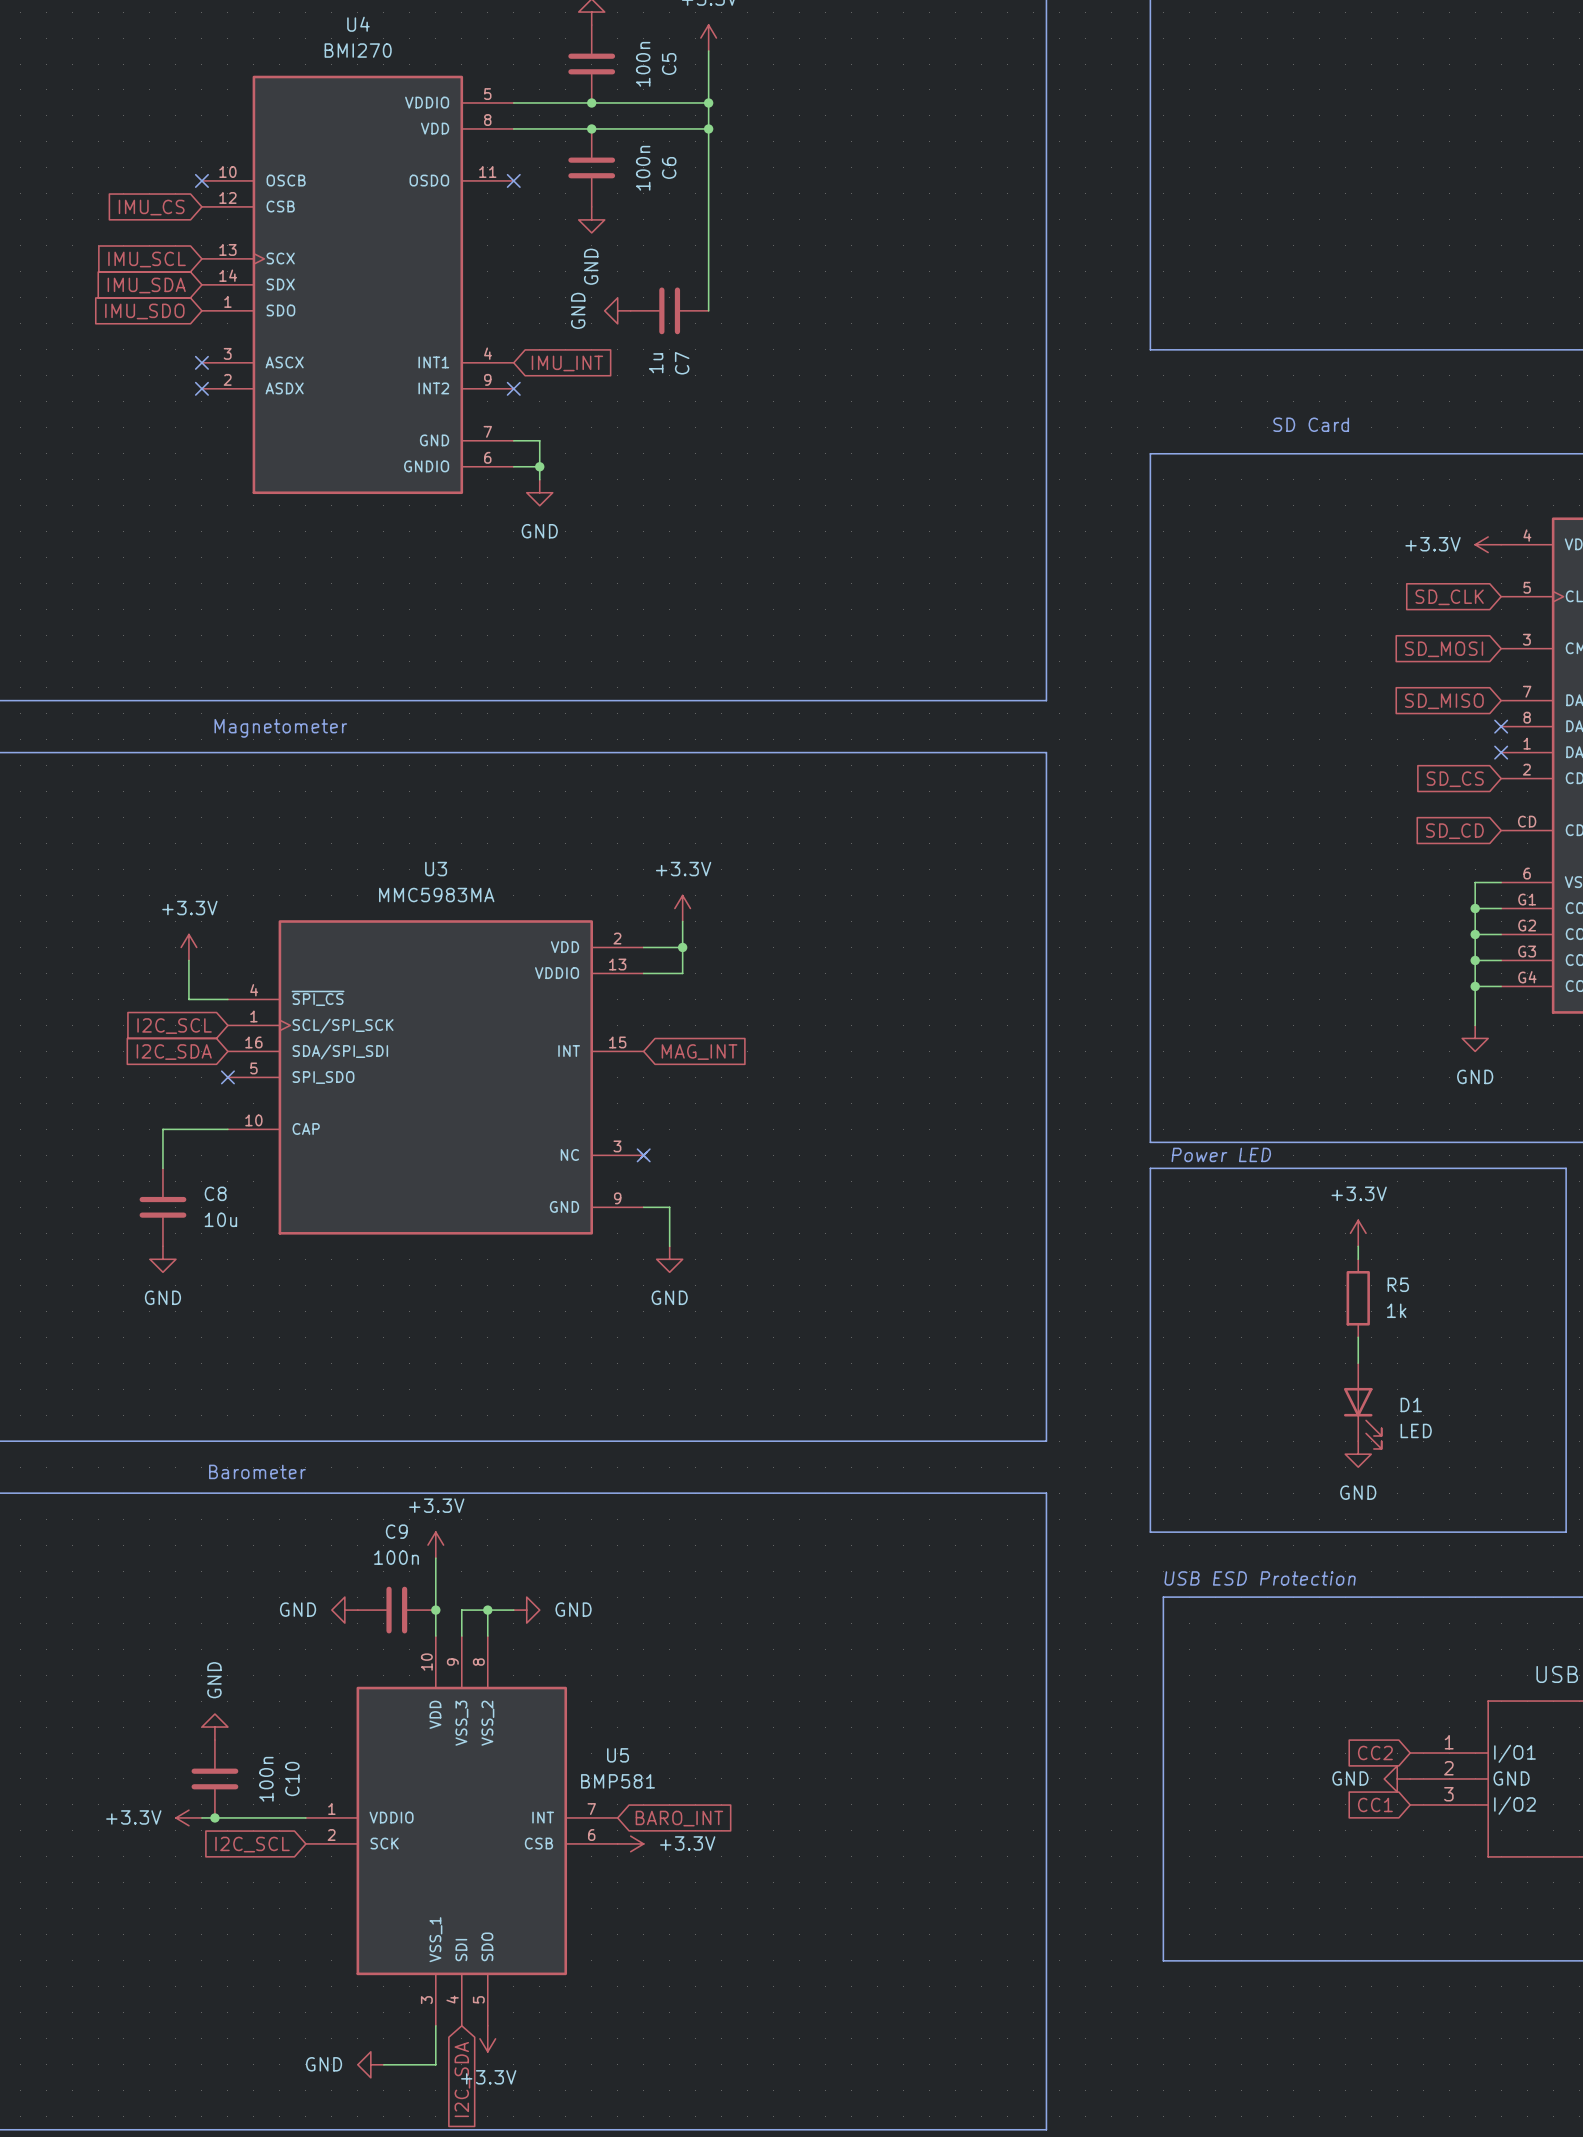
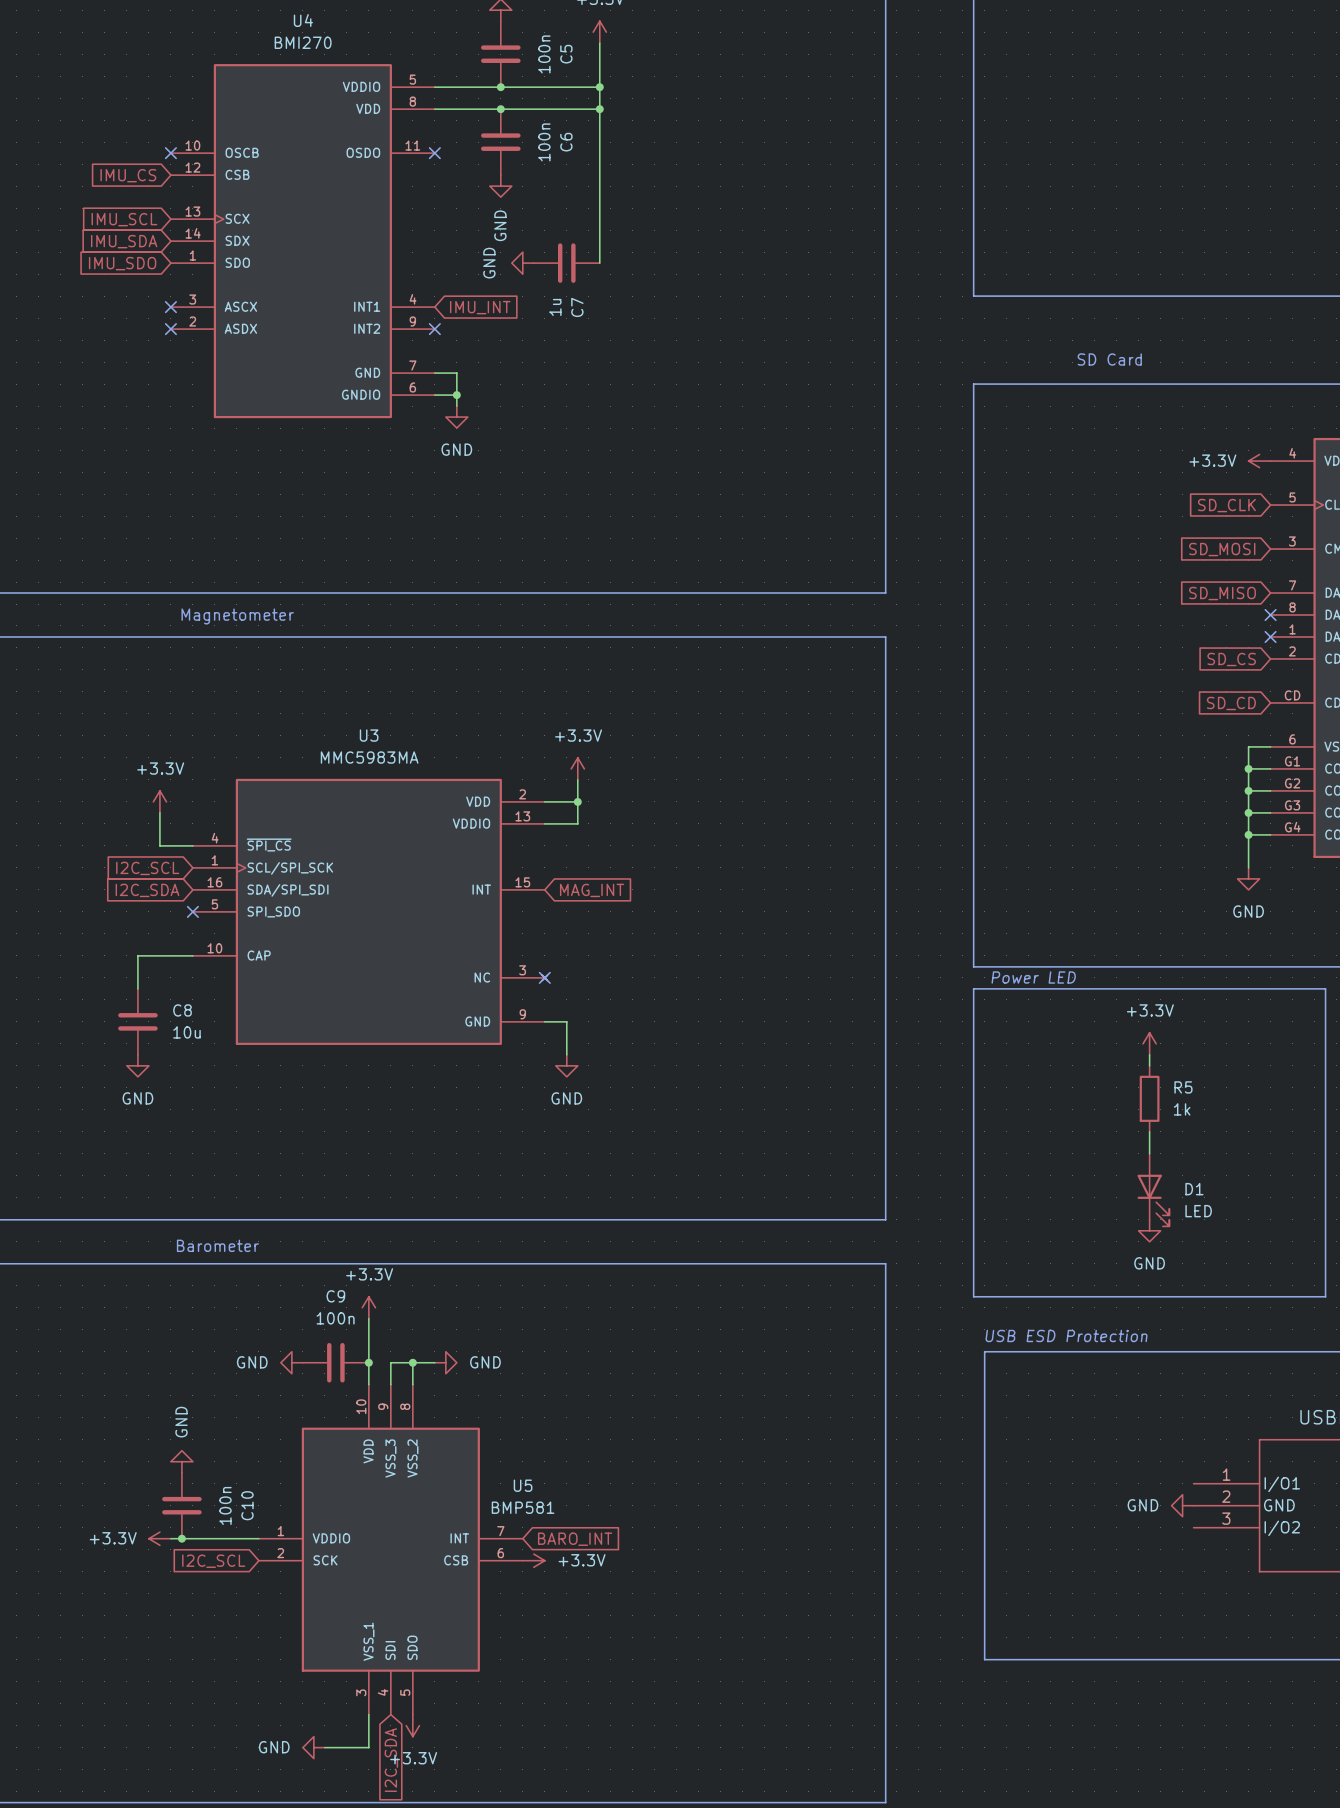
global label: CC2 (1375, 1753) -> none
global label: CC1 (1375, 1804) -> none

